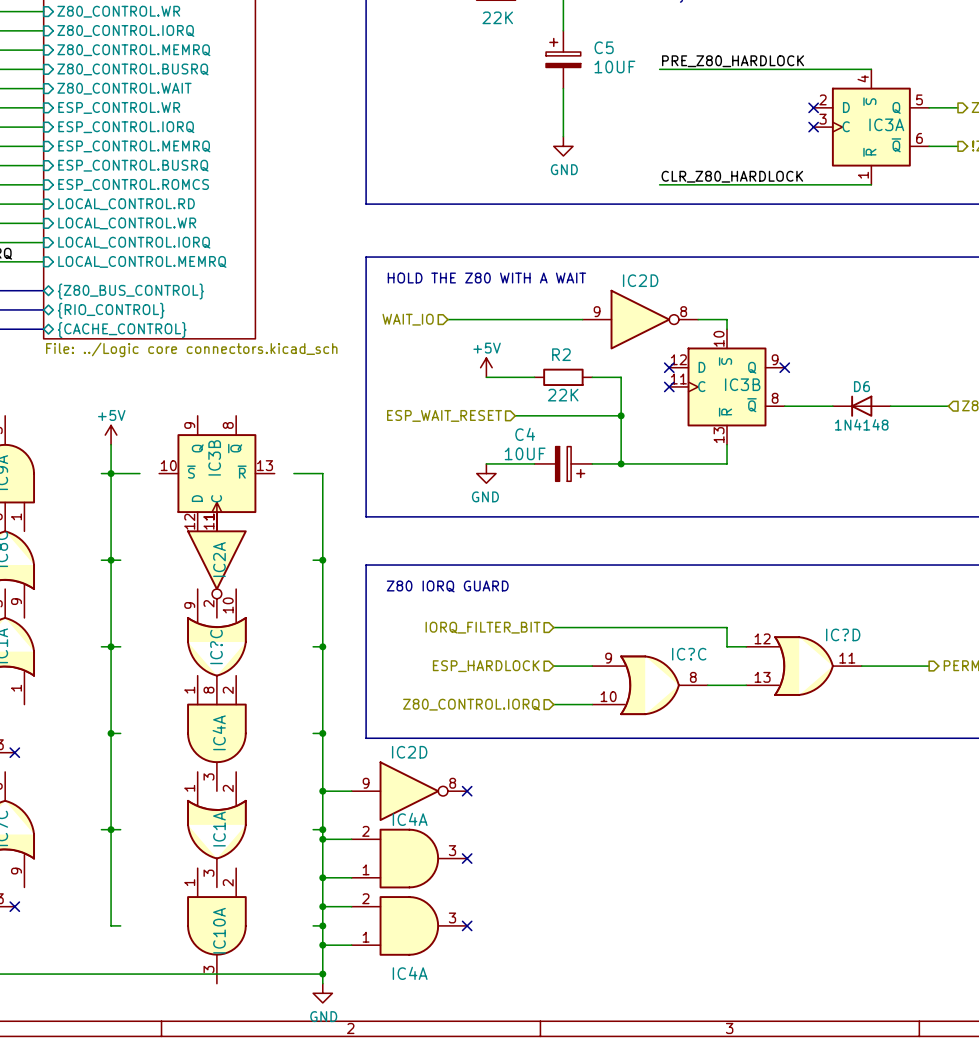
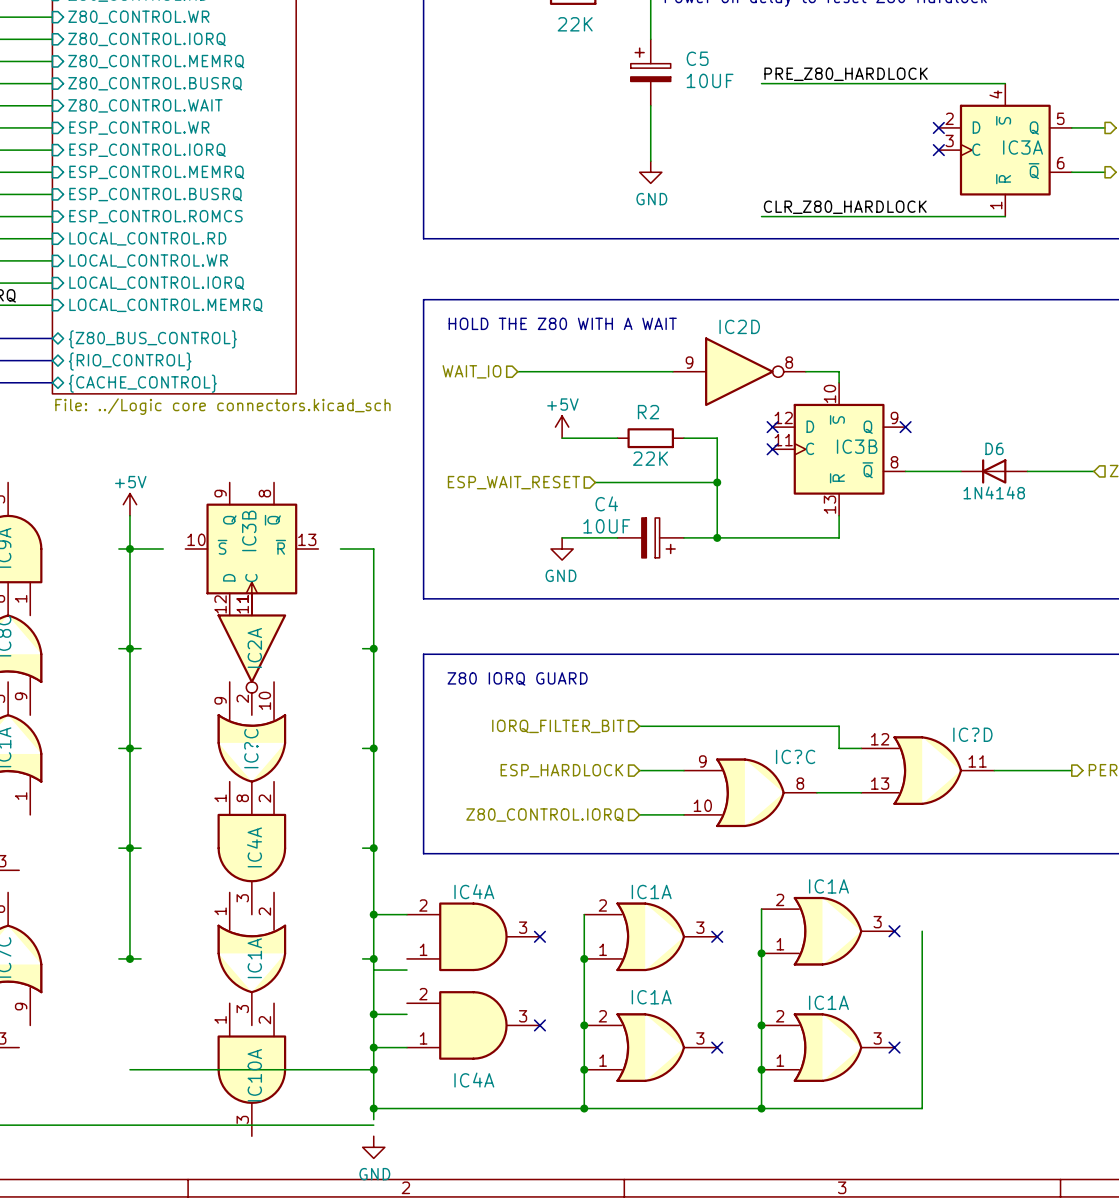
wire: none -> (118, 848) (129, 848)
no-connect mark: (14, 752) -> none
wire: none -> (761, 909) (761, 1108)
IC2D: (409, 791) -> none
no-connect mark position: (467, 791) -> (539, 936)
wire: none -> (584, 914) (584, 1108)
IC1A: none -> (828, 931)
no-connect mark: none -> (894, 931)
wire: none -> (922, 931) (922, 1108) (373, 1108)
IC4A: none -> (473, 936)
IC1A: none -> (650, 936)
no-connect mark: none -> (717, 936)
junction: none -> (761, 953)
wire: (111, 829) (111, 925) -> none
junction: none -> (584, 958)
junction: (322, 839) -> none
IC4A: (409, 858) -> none
no-connect mark: (467, 858) -> none
IC4A: none -> (473, 1025)
no-connect mark: none -> (539, 1025)
junction: none -> (584, 1025)
junction: none -> (761, 1025)
no-connect mark: (14, 906) -> none
IC1A: none -> (650, 1047)
no-connect mark: none -> (717, 1047)
IC1A: none -> (828, 1047)
no-connect mark: none -> (894, 1047)
wire: none -> (141, 1069) (362, 1069)
IC4A: (409, 925) -> none
no-connect mark: (467, 925) -> none
junction: none -> (584, 1069)
junction: none -> (761, 1069)
wire: (322, 945) (351, 945) -> none
junction: (322, 945) -> none
junction: none -> (373, 1108)
junction: none -> (584, 1108)
junction: none -> (761, 1108)
wire: (322, 969) (322, 983) -> none
junction: (322, 974) -> none

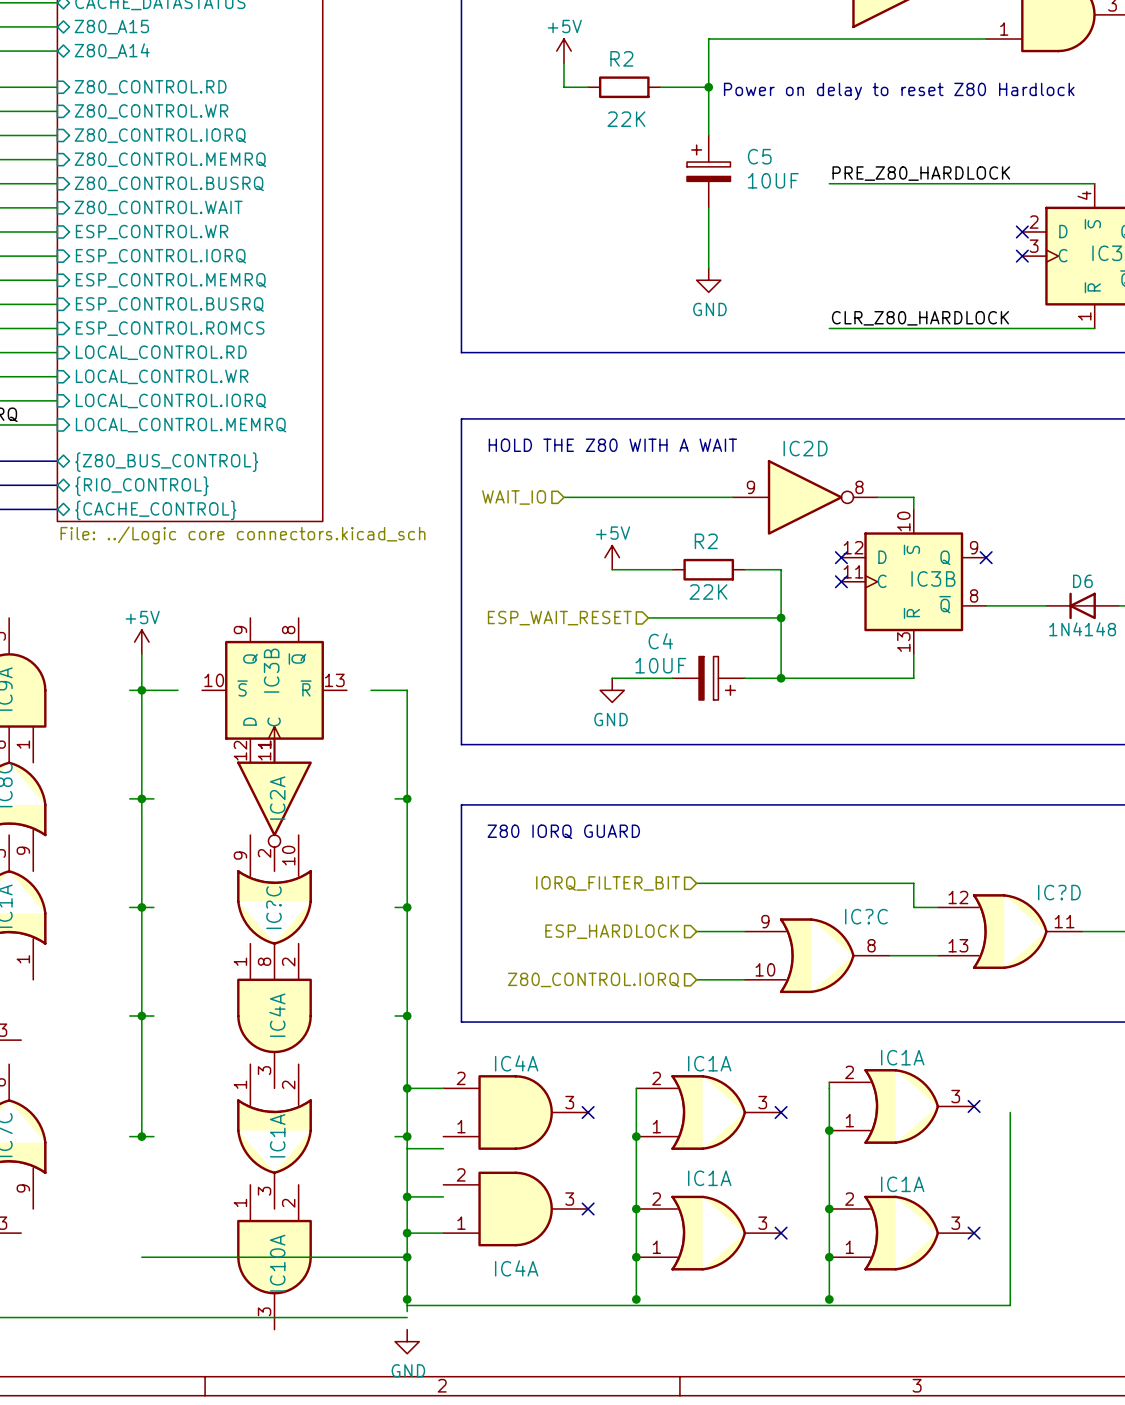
wire: (922, 931) (922, 1108) (373, 1108) -> none
wire: none -> (1010, 1112) (1010, 1305) (407, 1305)

